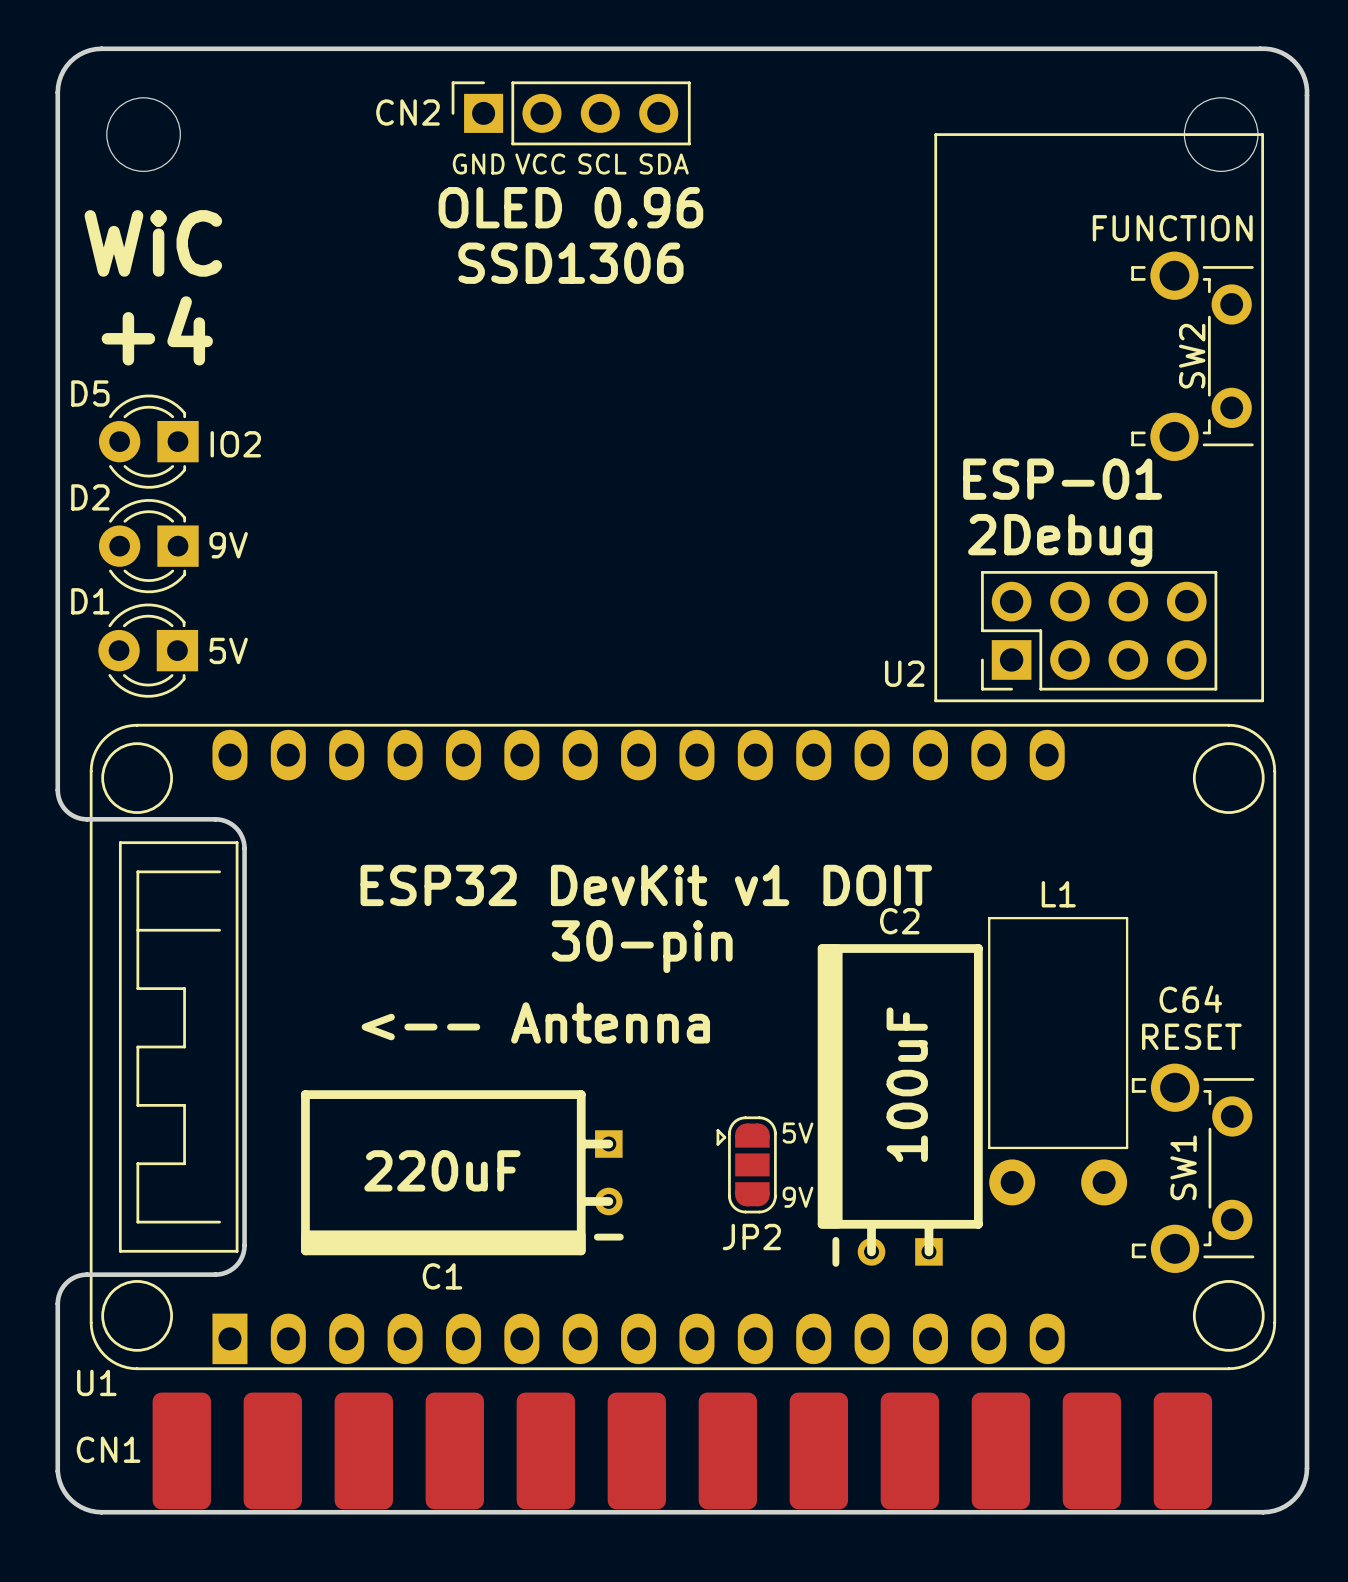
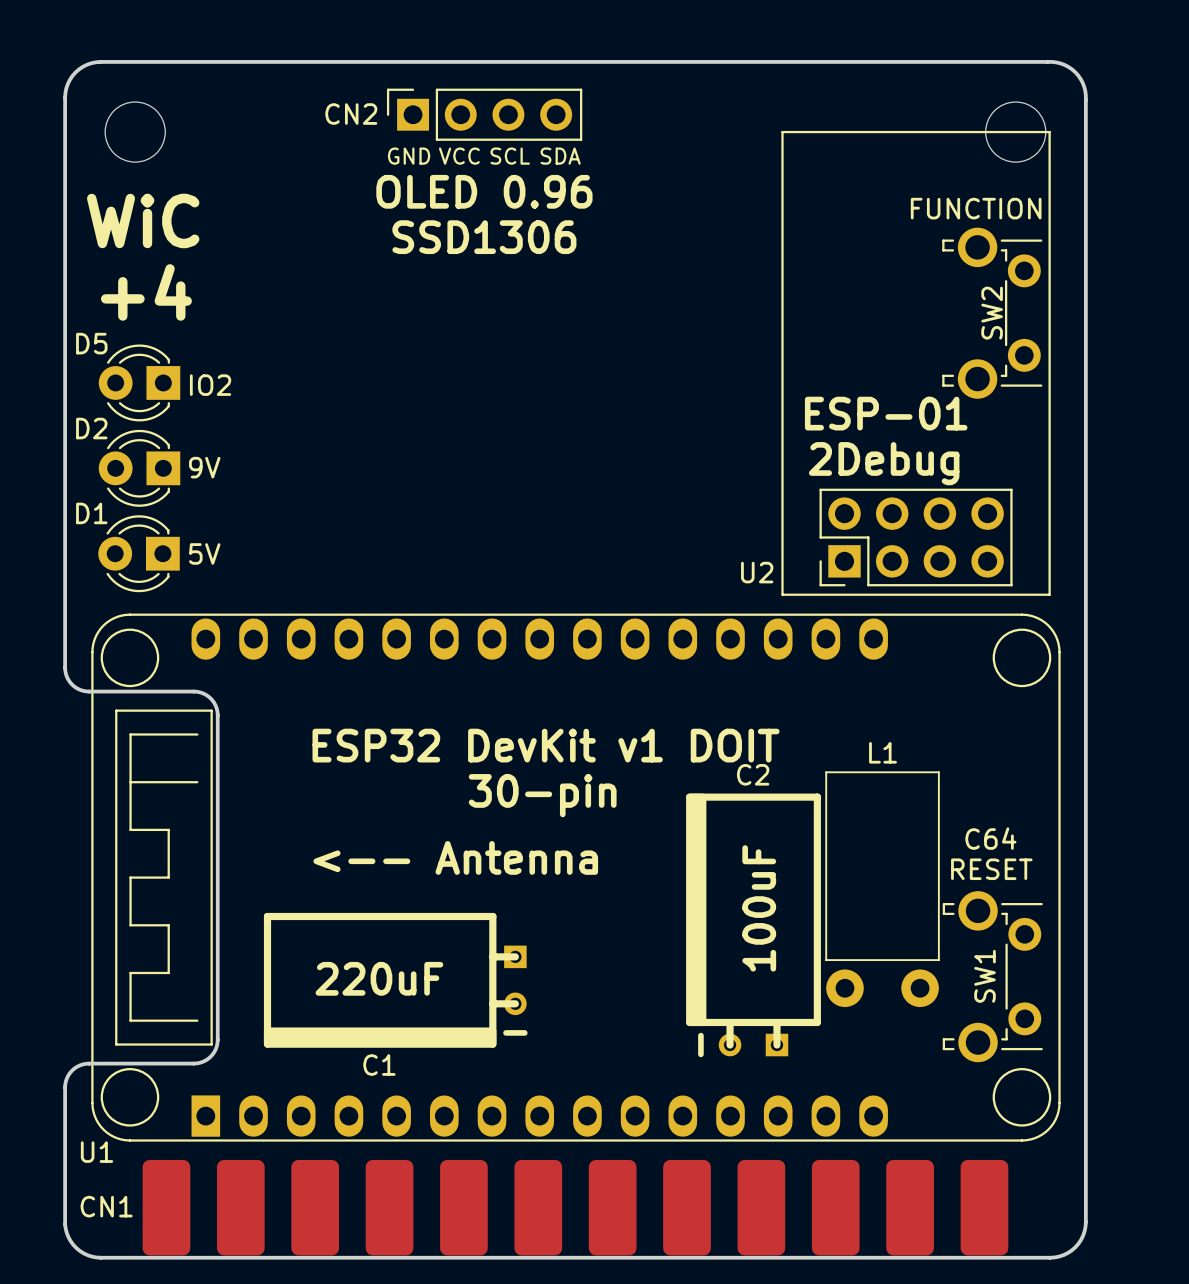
text: 5V (798, 1133) -> none
JP2: (746, 1164) -> none
text: 9V (798, 1197) -> none

